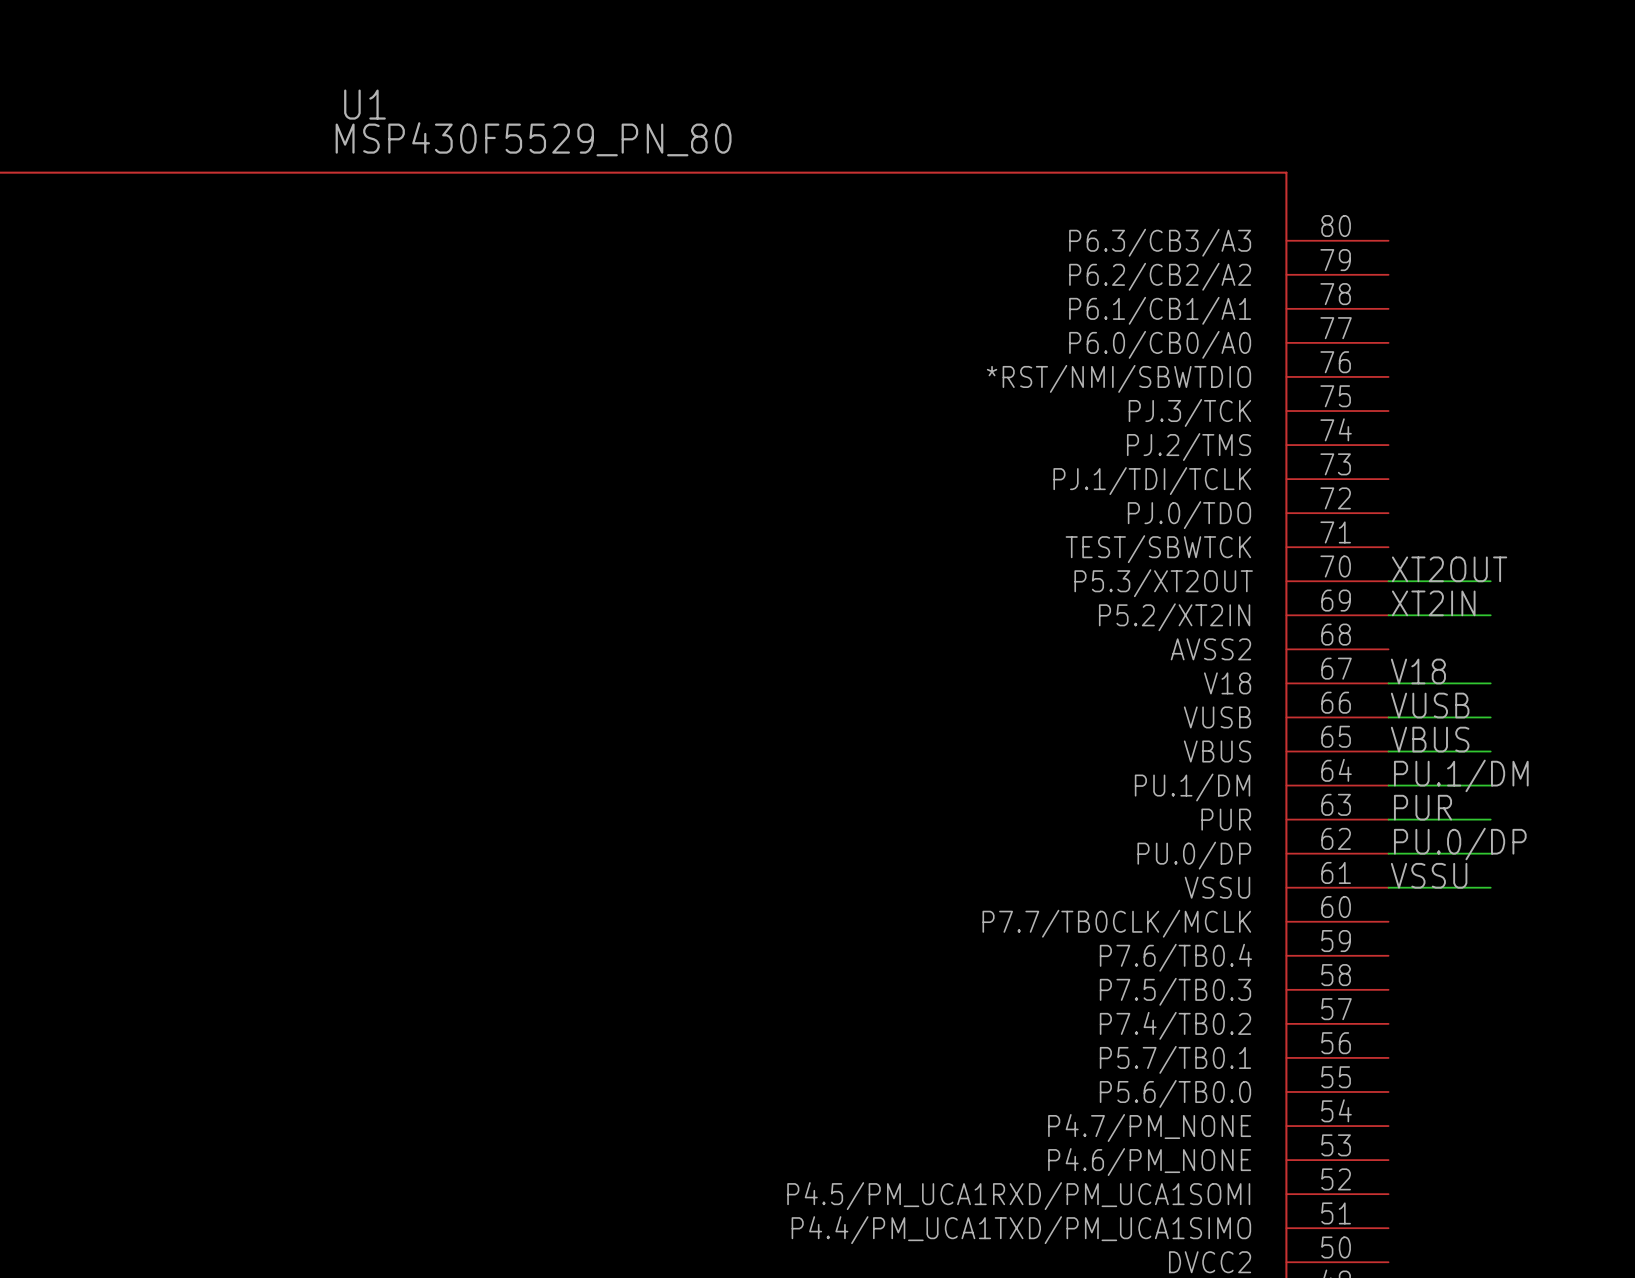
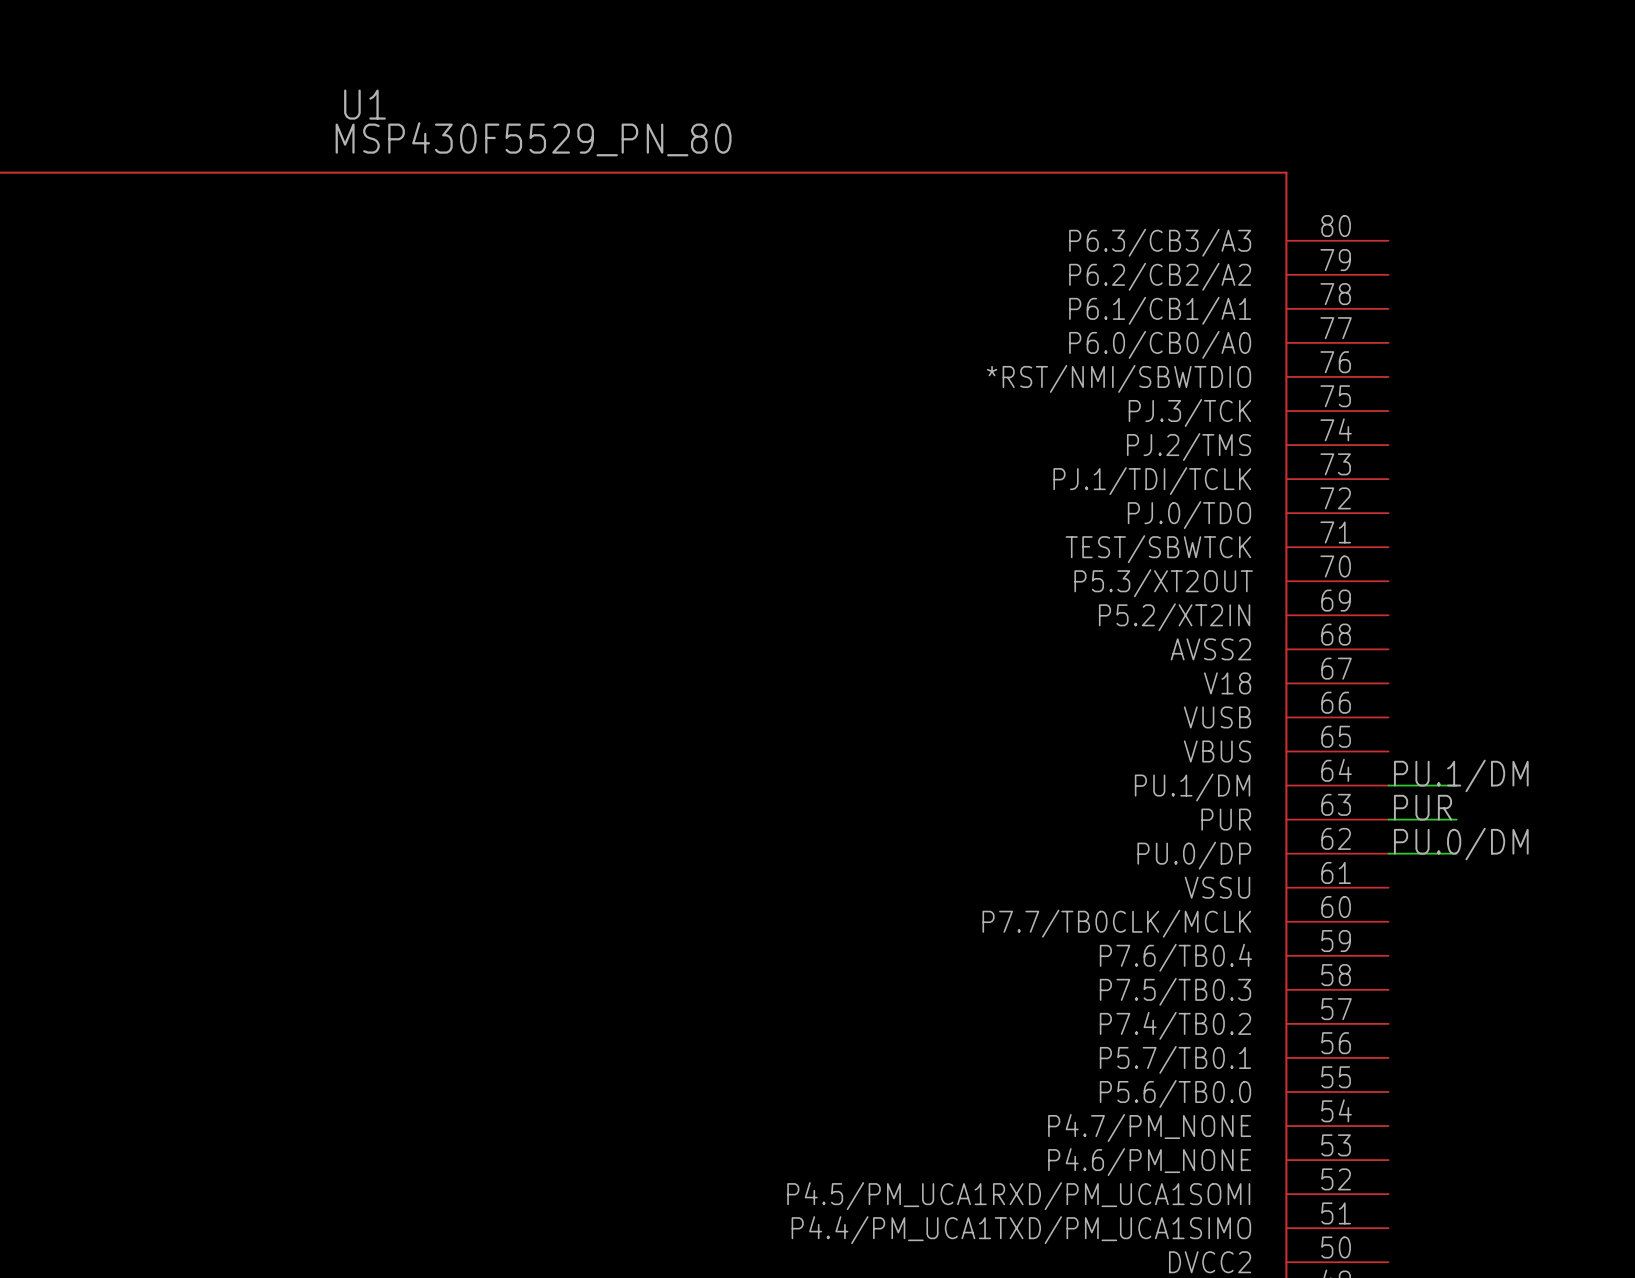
label: XT2OUT (1449, 569) -> none
wire: (1388, 581) (1490, 581) -> none
label: XT2IN (1433, 603) -> none
wire: (1388, 615) (1490, 615) -> none
label: V18 (1418, 671) -> none
wire: (1388, 683) (1490, 683) -> none
label: VUSB (1430, 705) -> none
wire: (1388, 717) (1490, 717) -> none
label: VBUS (1430, 739) -> none
wire: (1388, 751) (1490, 751) -> none
wire: (1456, 785) (1490, 785) -> none
wire: (1456, 819) (1490, 819) -> none
label: PU.0/DP (1460, 844) -> PU.0/DM (1461, 844)
wire: (1456, 853) (1490, 853) -> none
label: VSSU (1429, 875) -> none
wire: (1388, 887) (1490, 887) -> none

